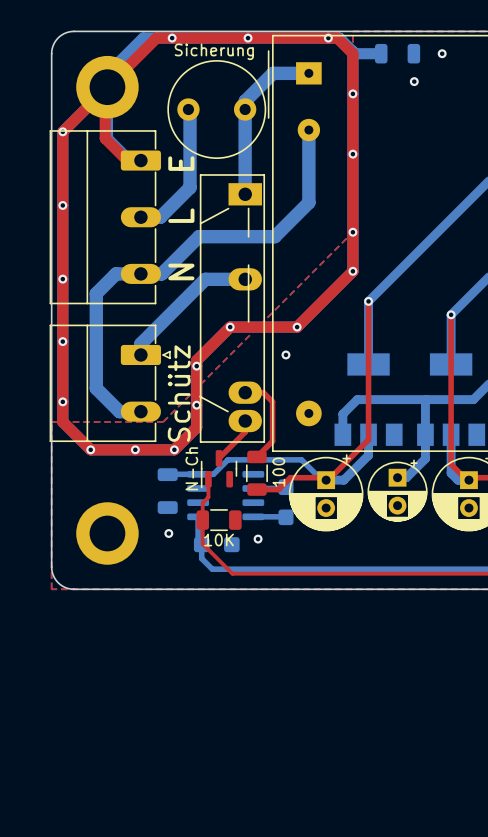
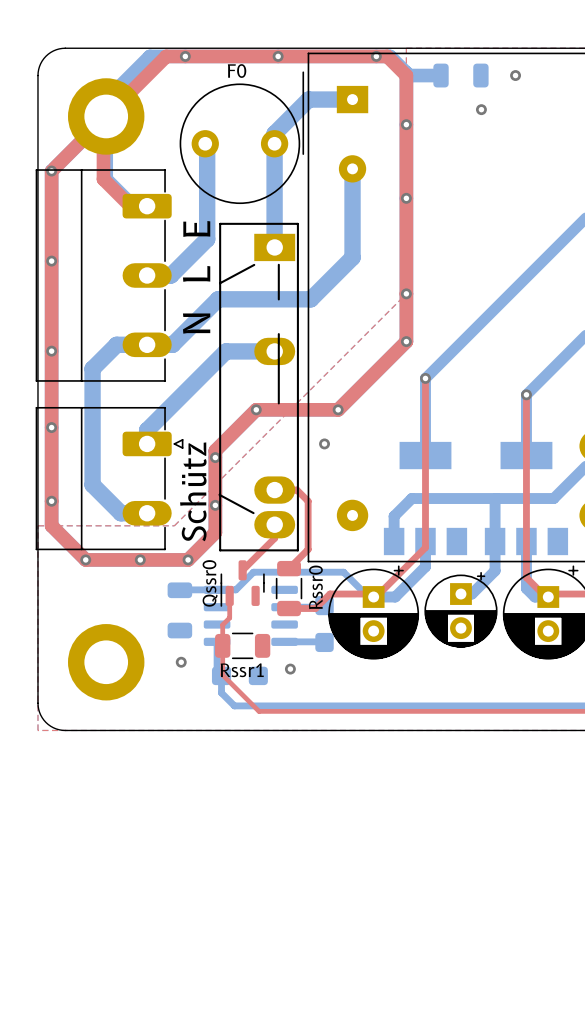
Sicherung name: Sicherung (214, 51) -> F0 (237, 71)
N-Ch name: N-Ch (191, 468) -> Qssr0 (210, 583)
100 name: 100 (278, 472) -> Rssr0 (315, 587)
10K name: 10K (219, 540) -> Rssr1 (242, 670)

